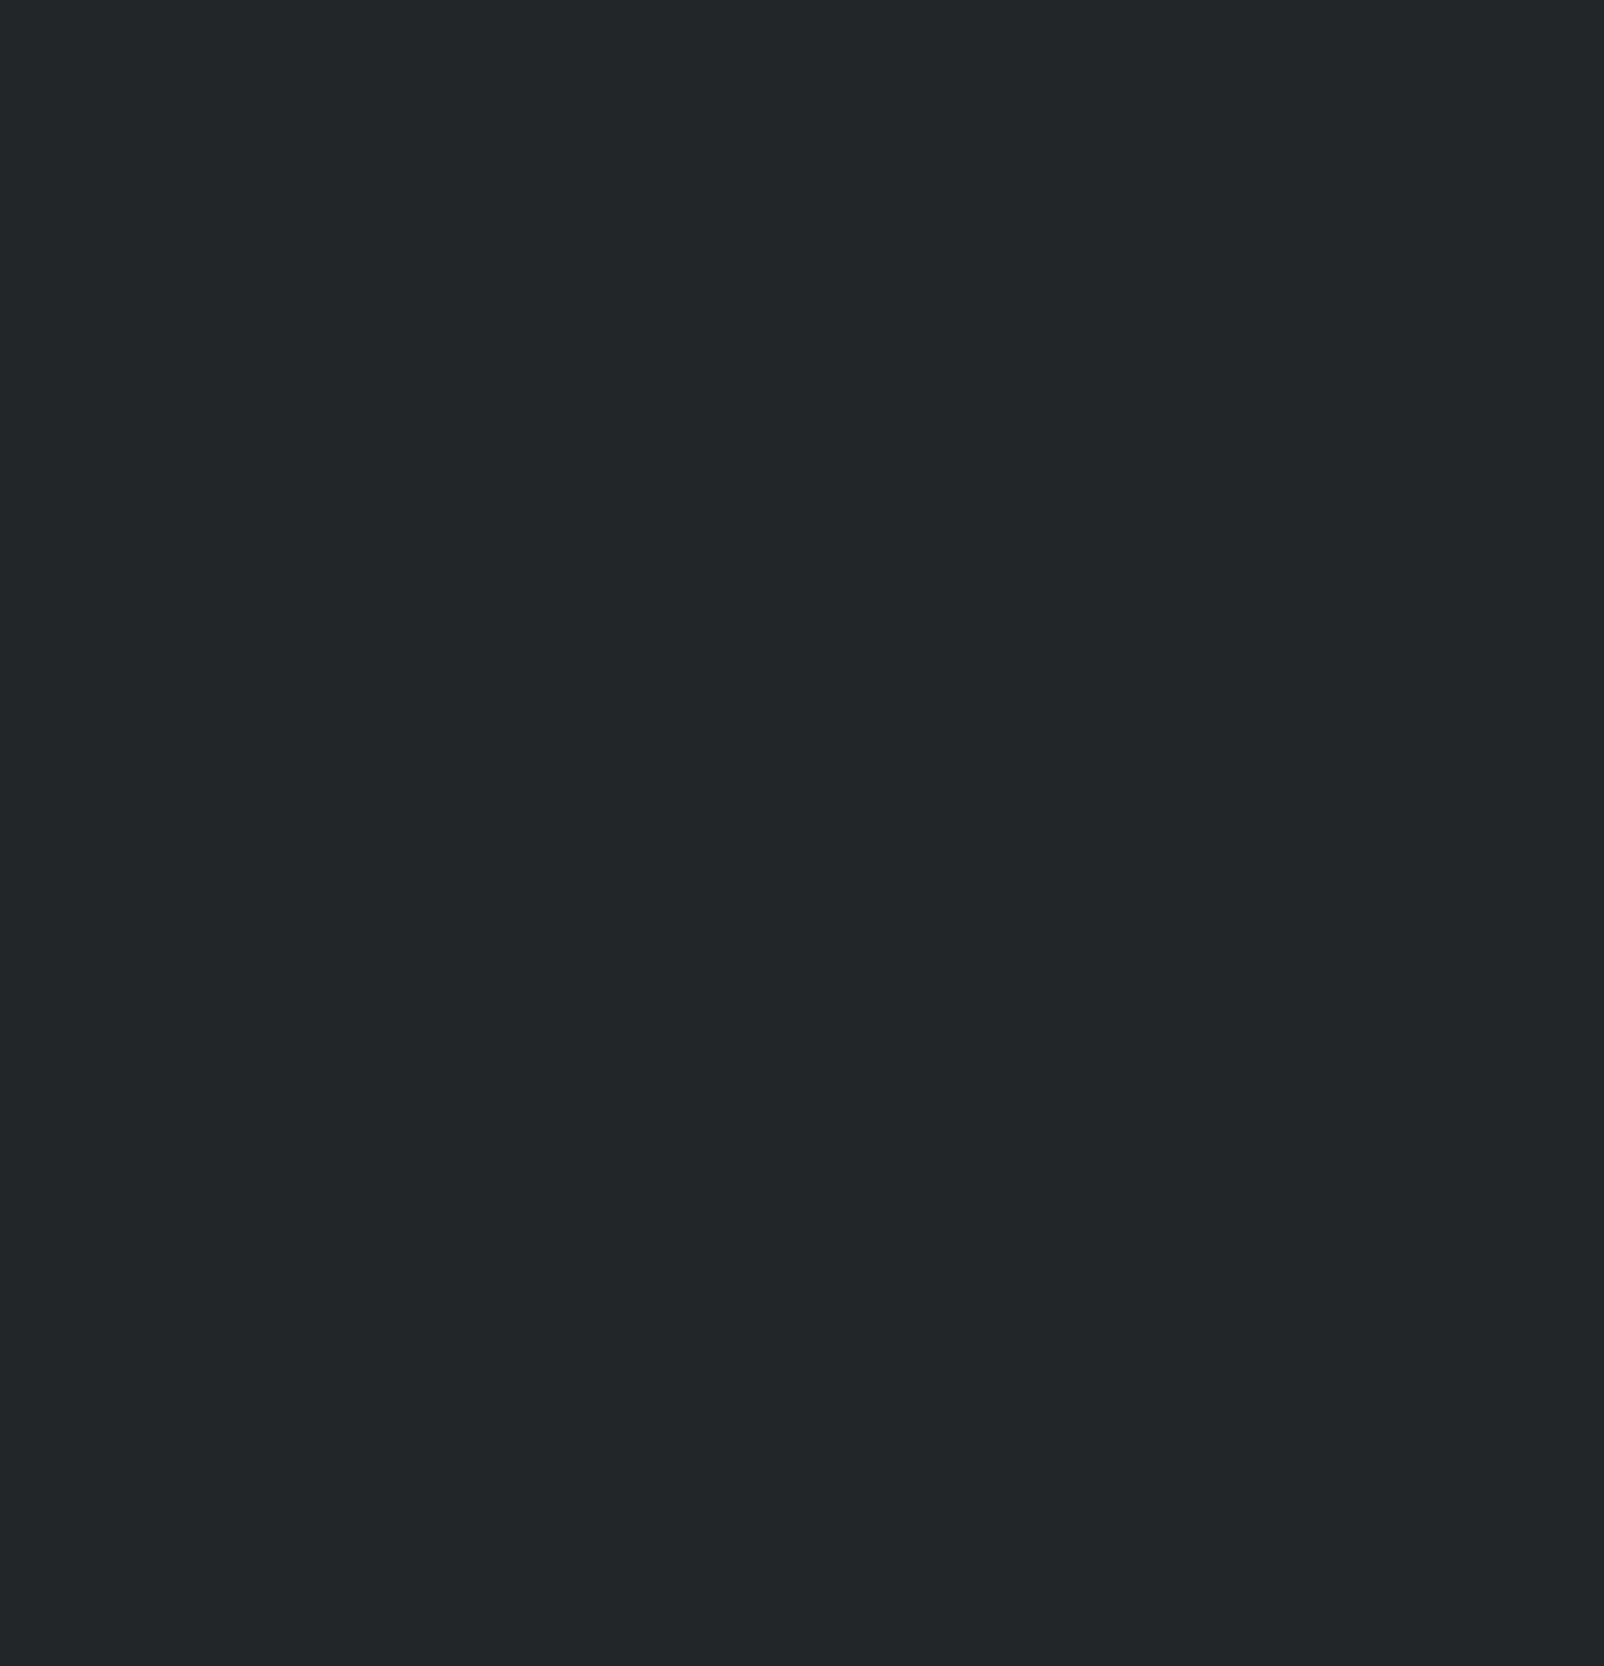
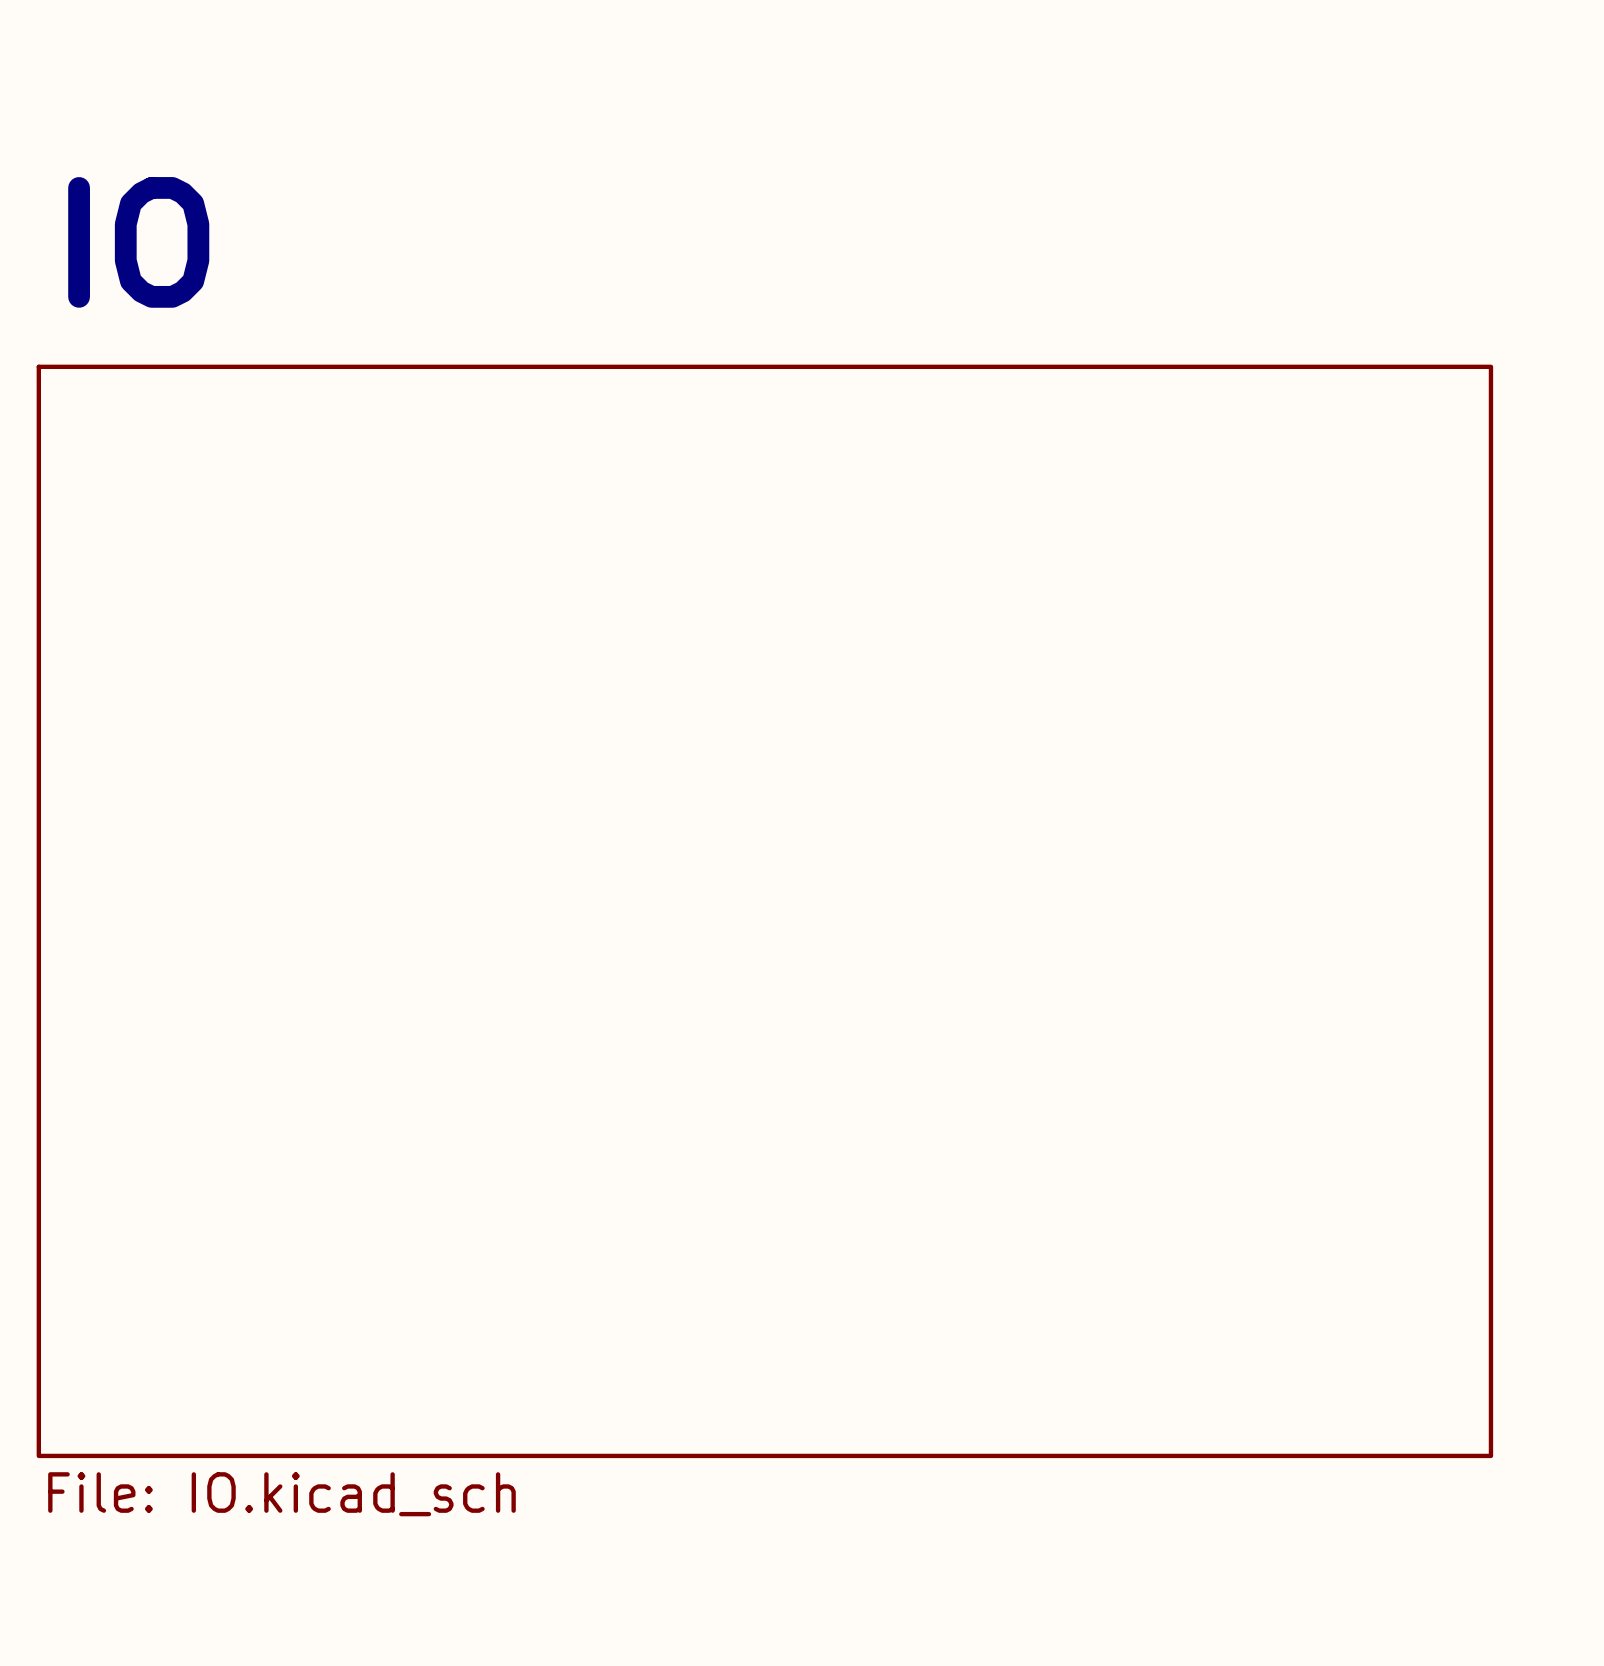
sheet IO: none -> File: IO.kicad_sch (764, 911)

